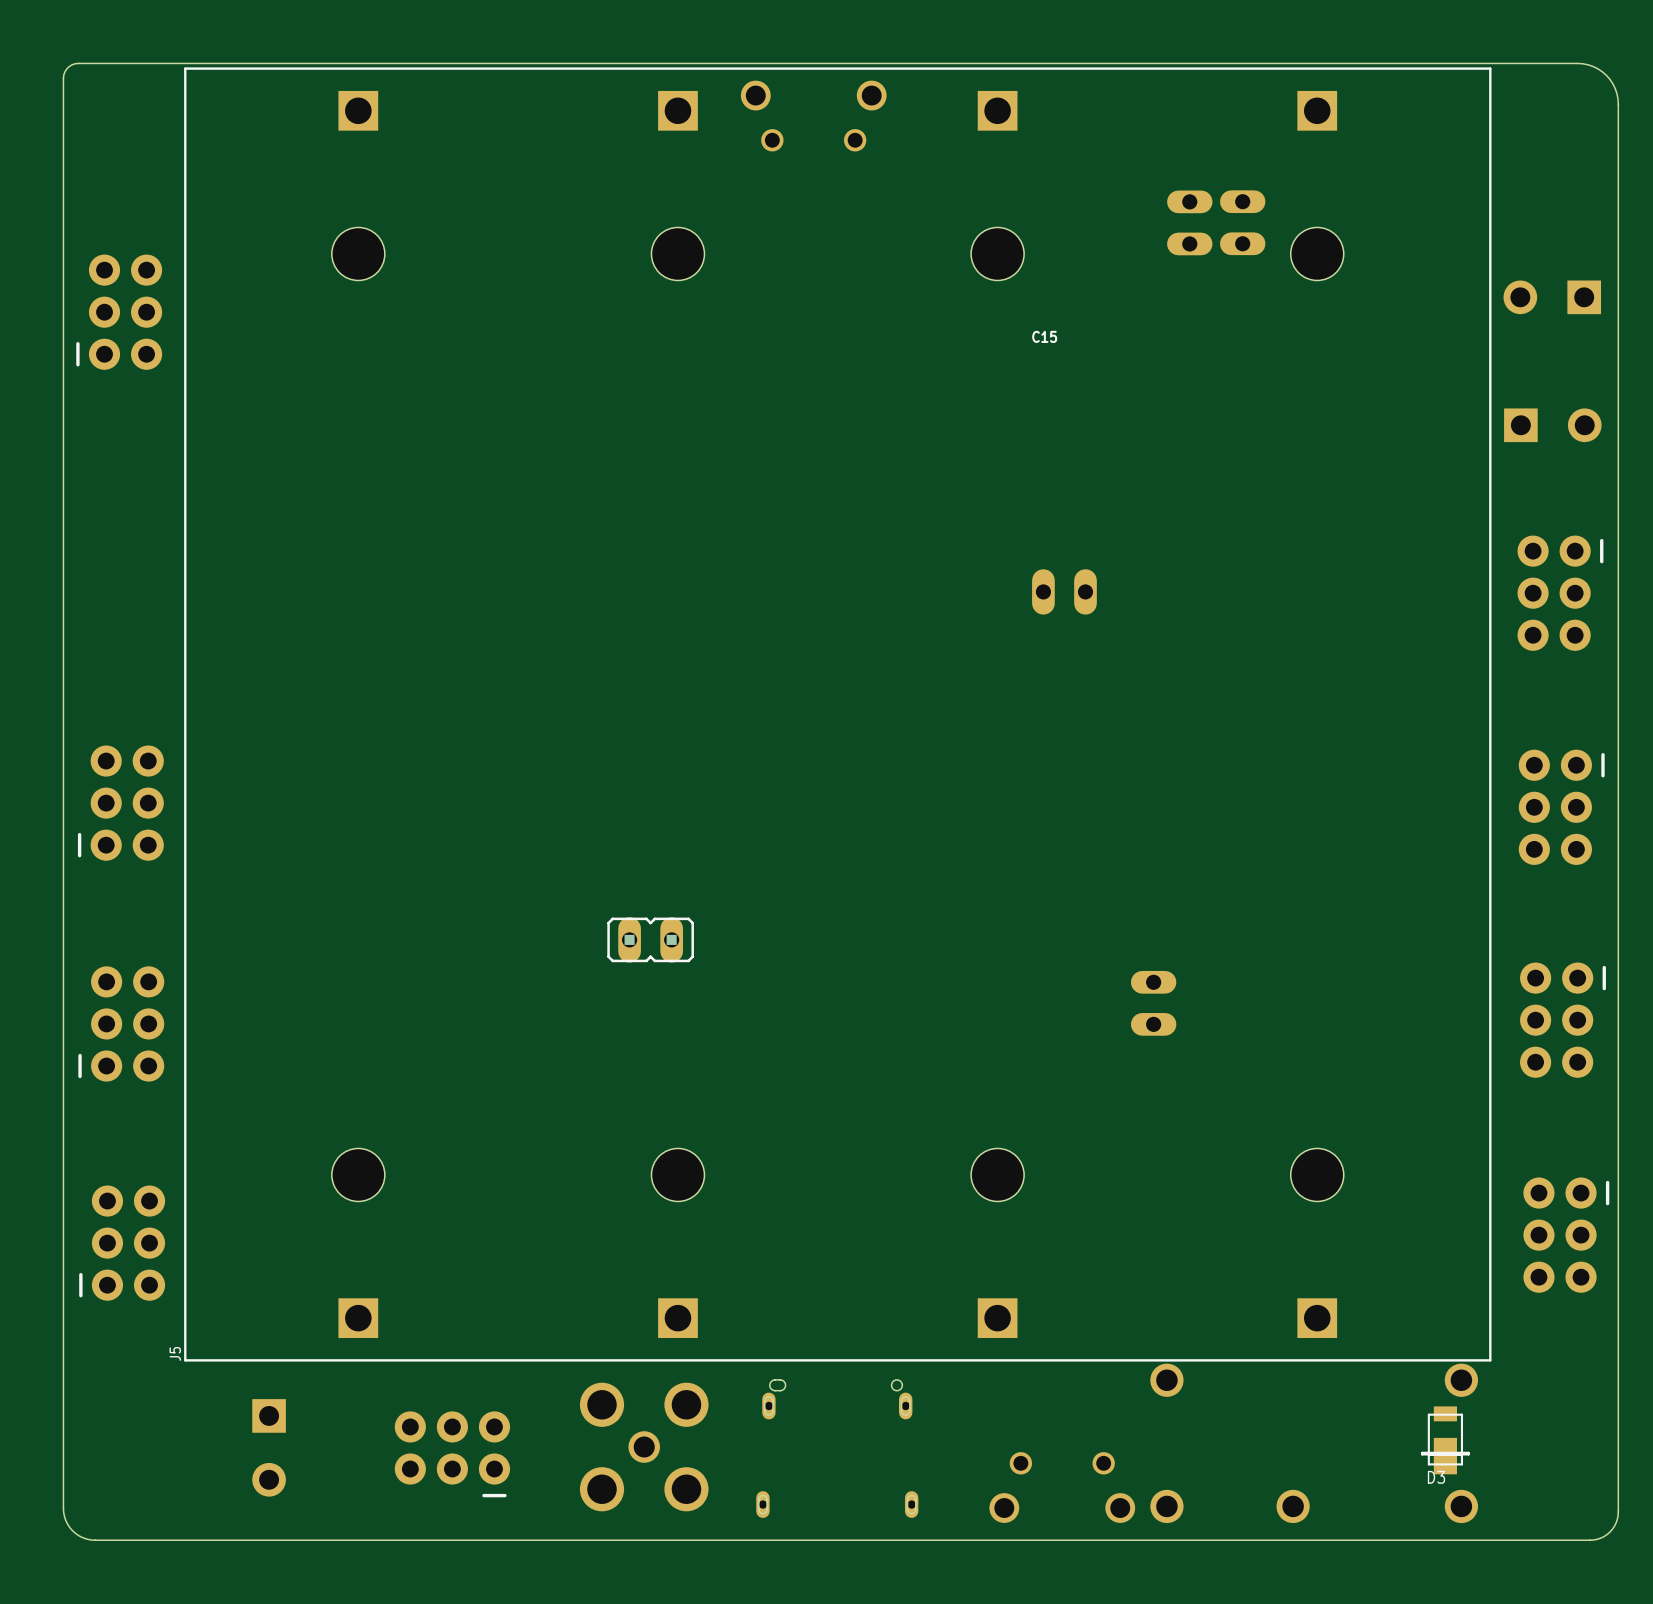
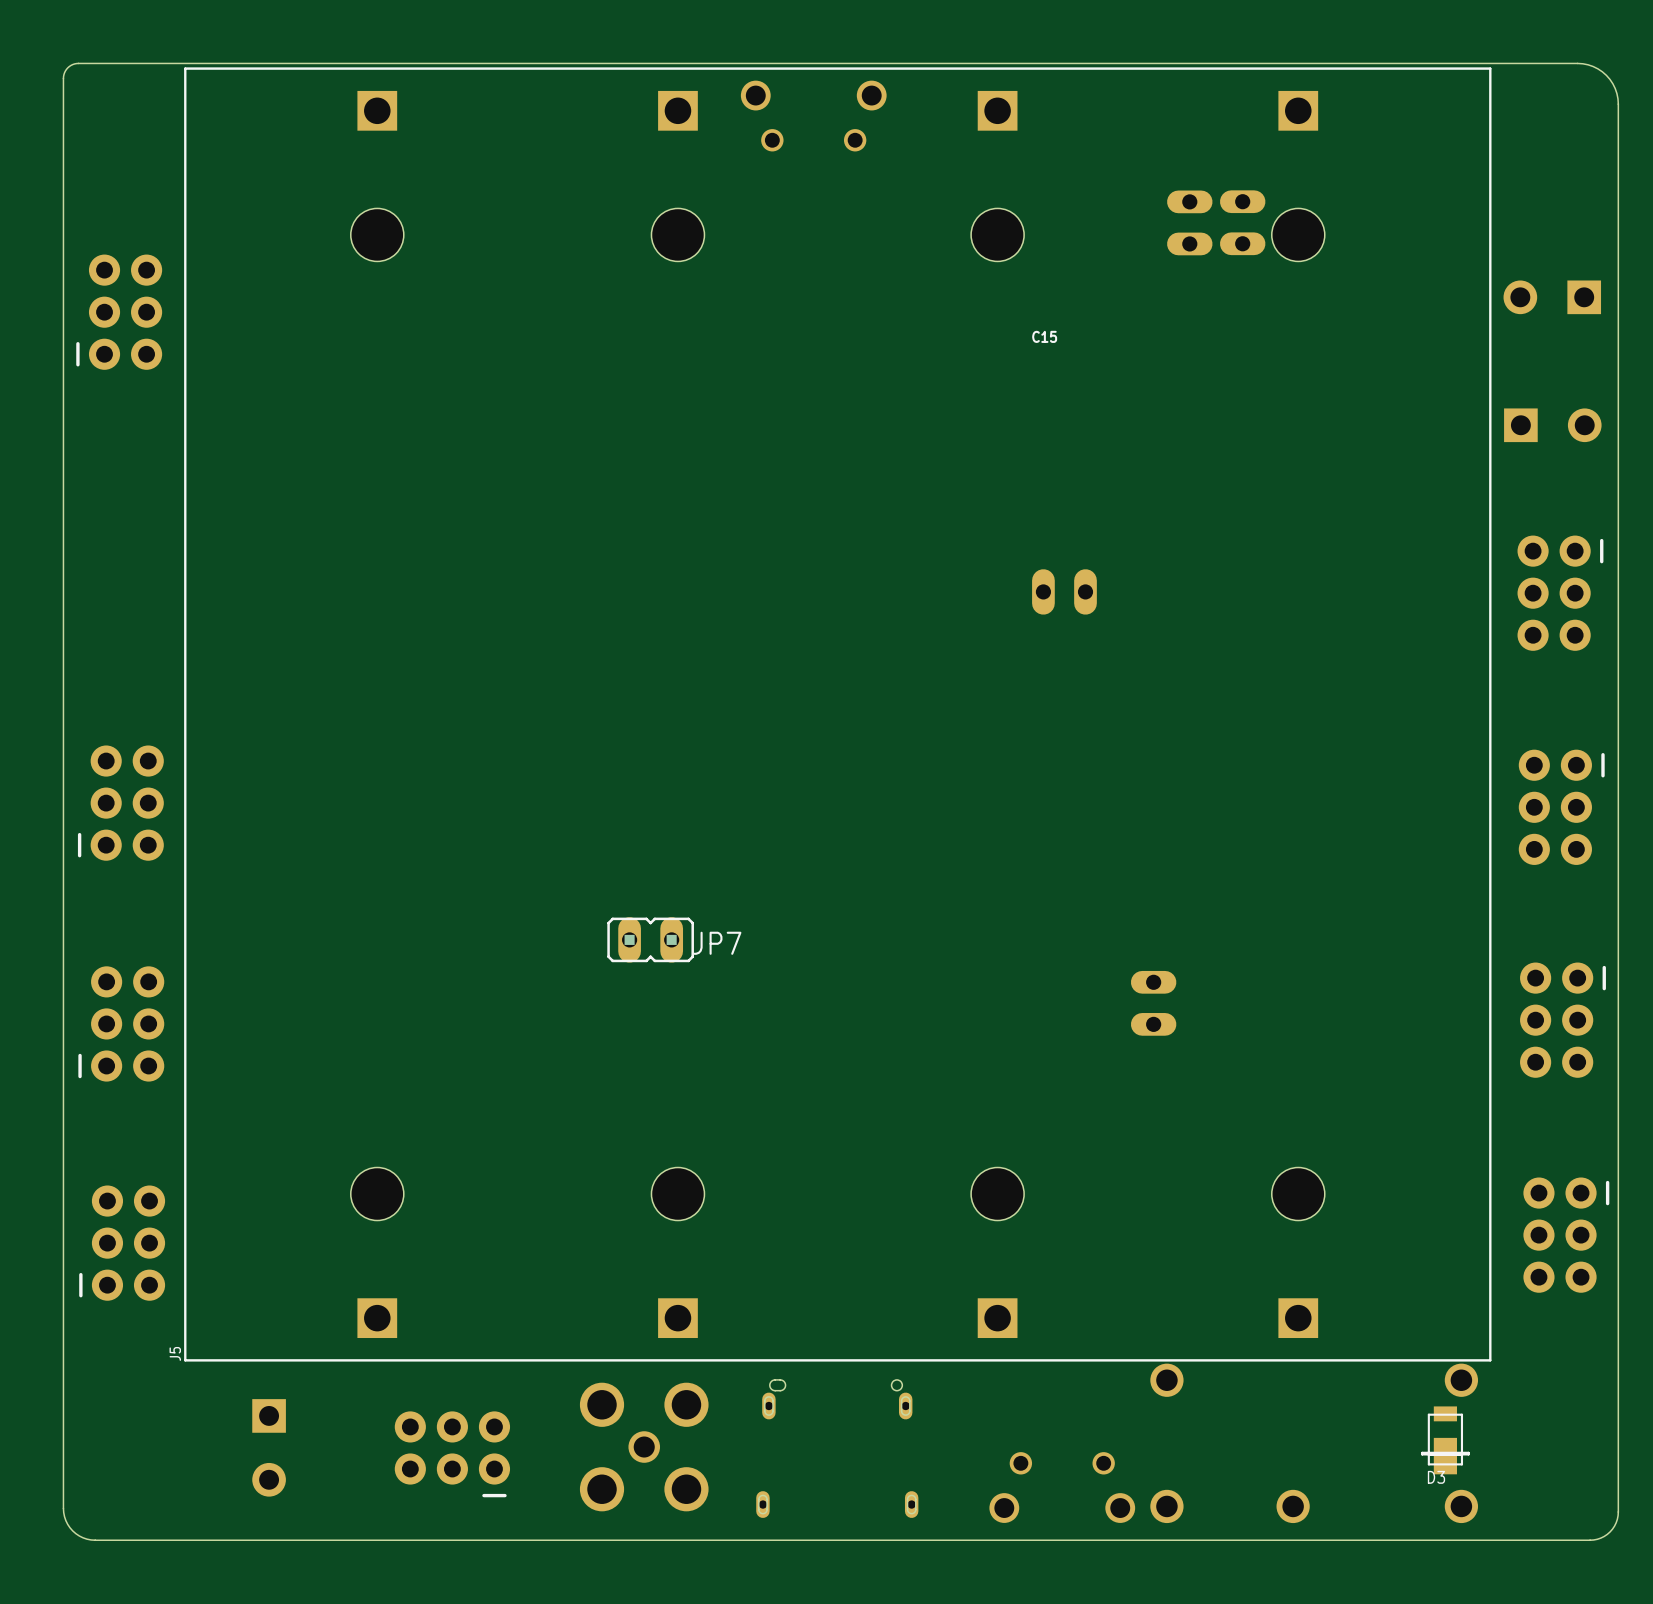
J5 footprint: [184, 67, 1492, 1362] -> [184, 67, 1492, 1362]
JP7 name: none -> JP7 (717, 943)

